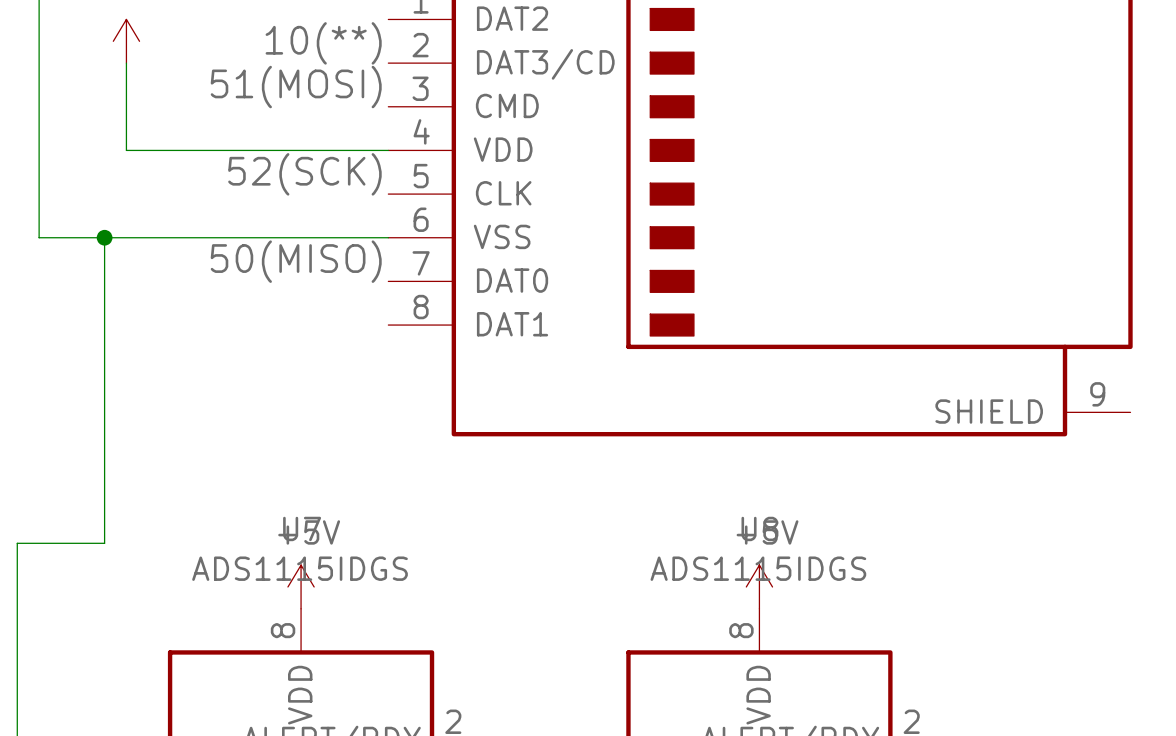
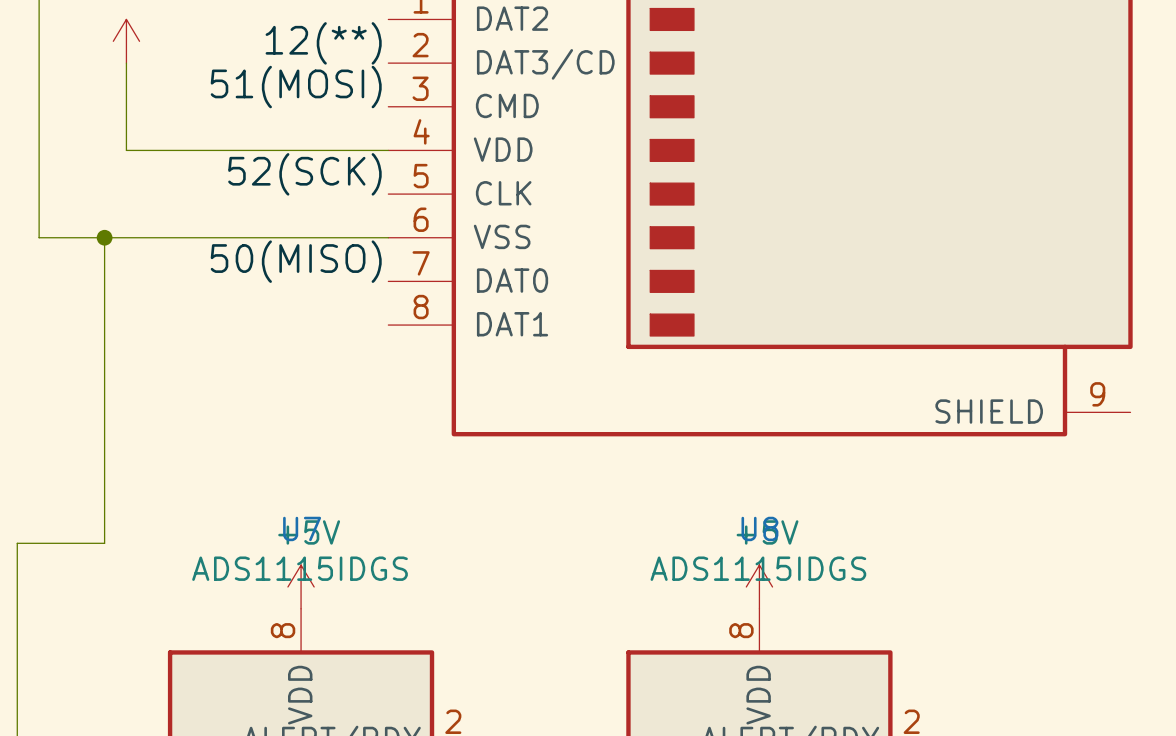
label: 10(**) (323, 43) -> 12(**) (323, 43)

